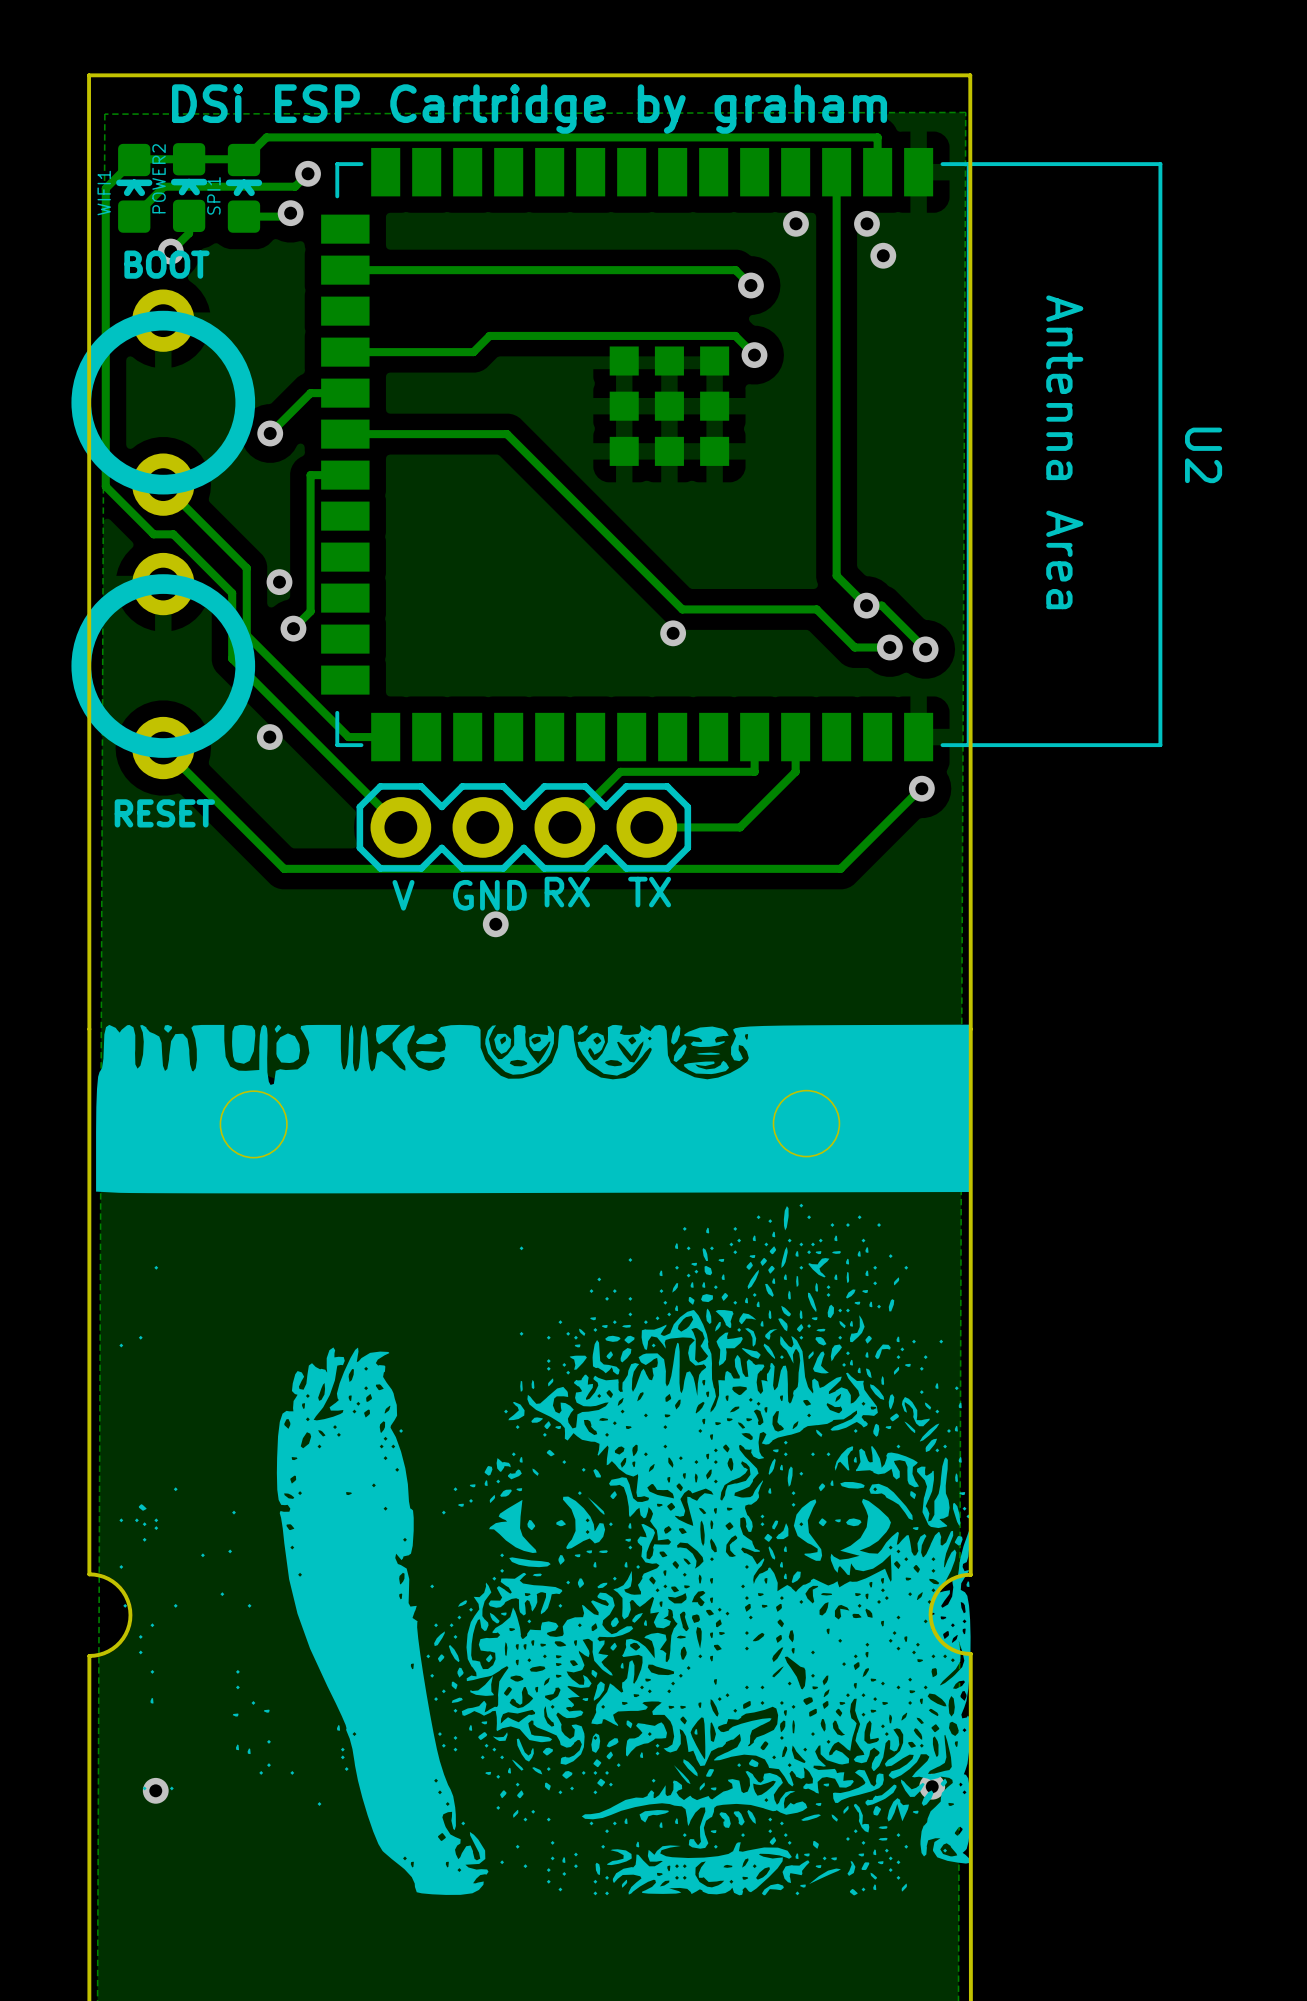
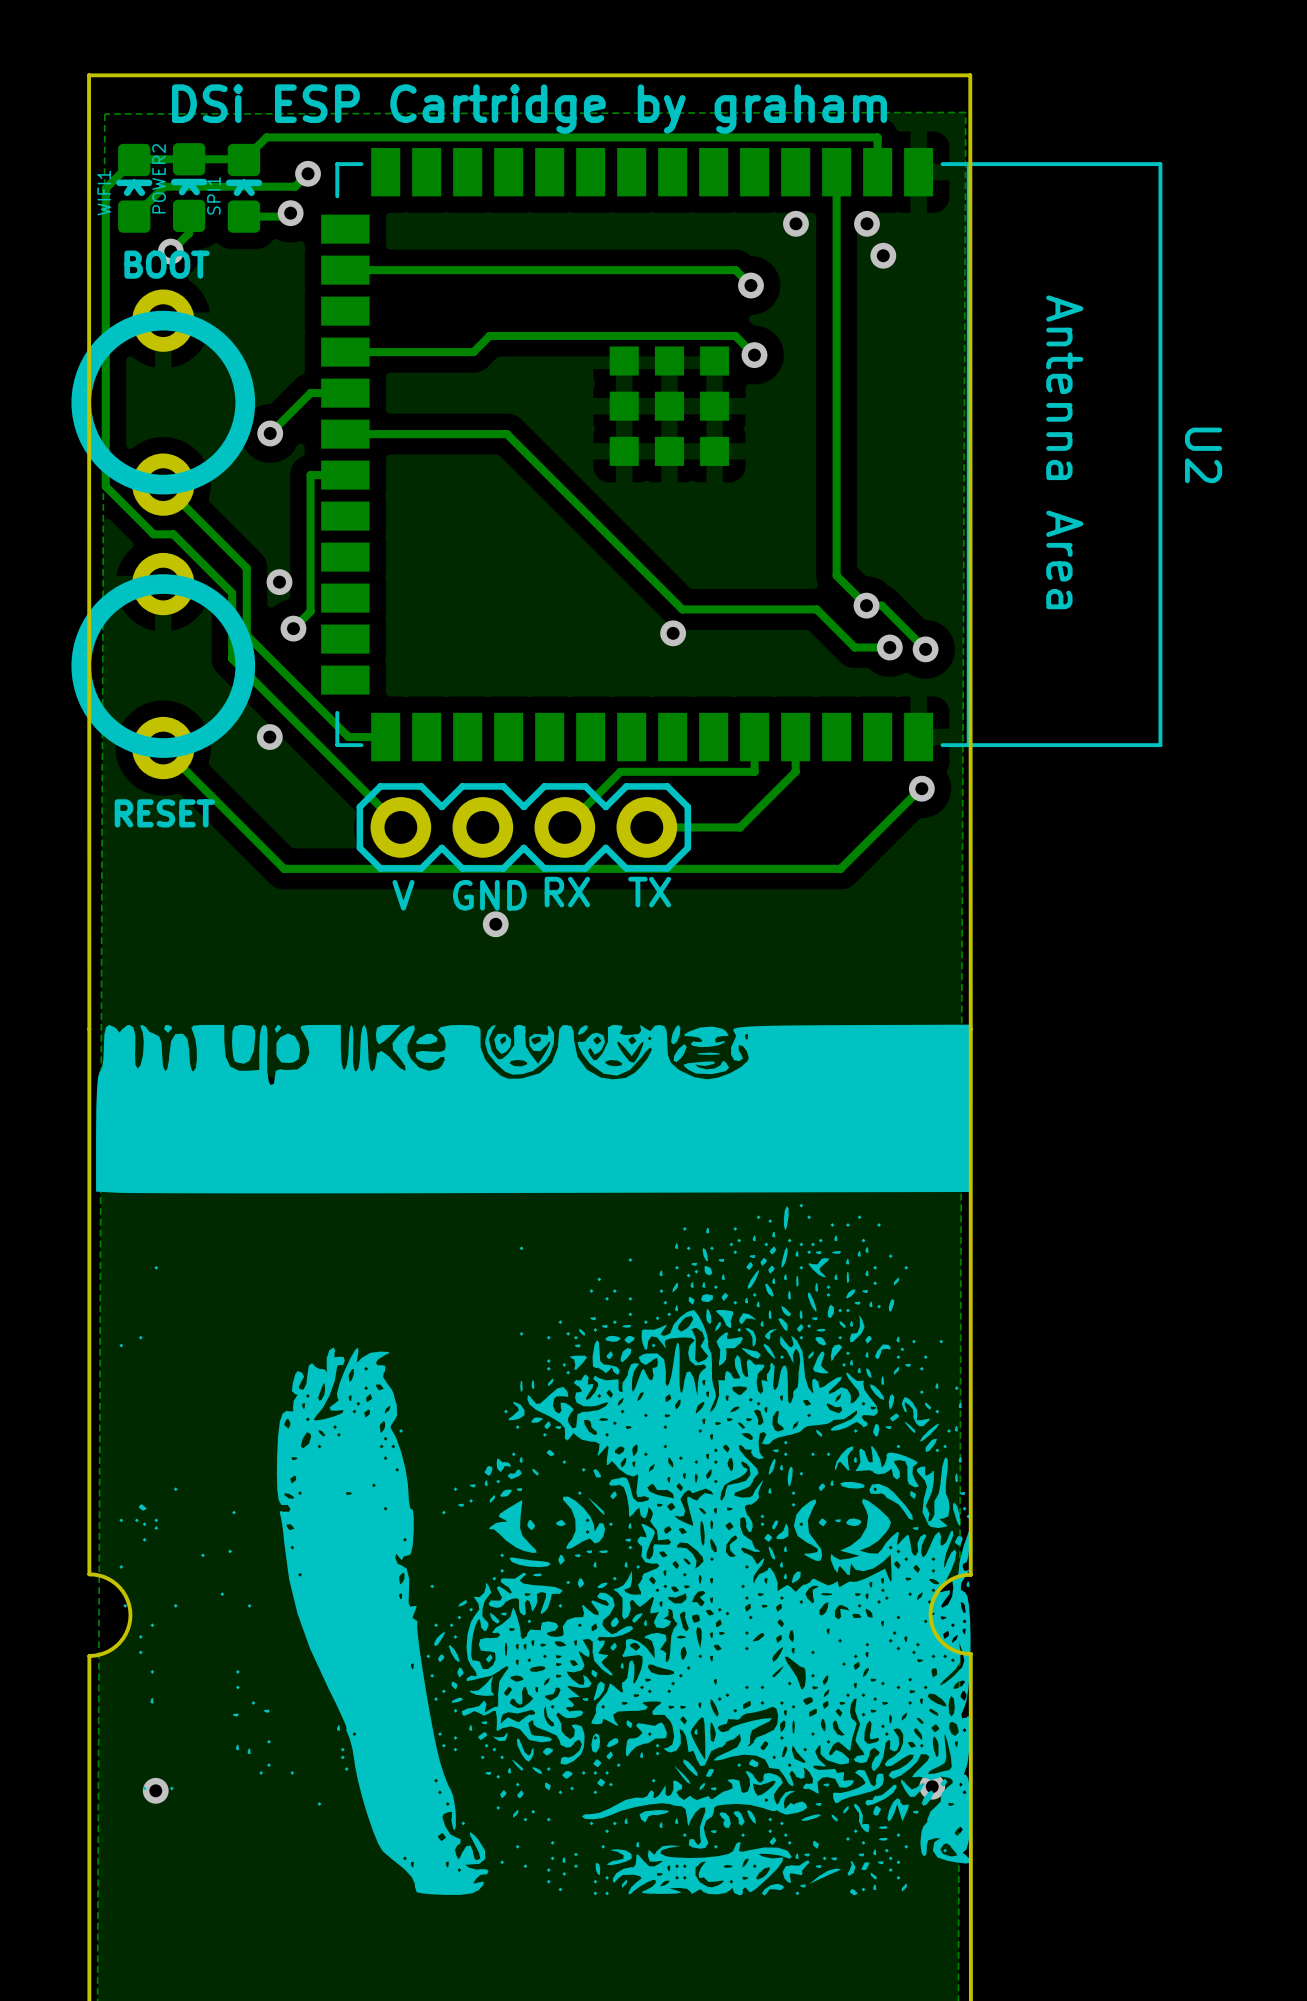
round board edge: [772, 1089, 841, 1158] -> none
round board edge: [219, 1090, 288, 1159] -> none

